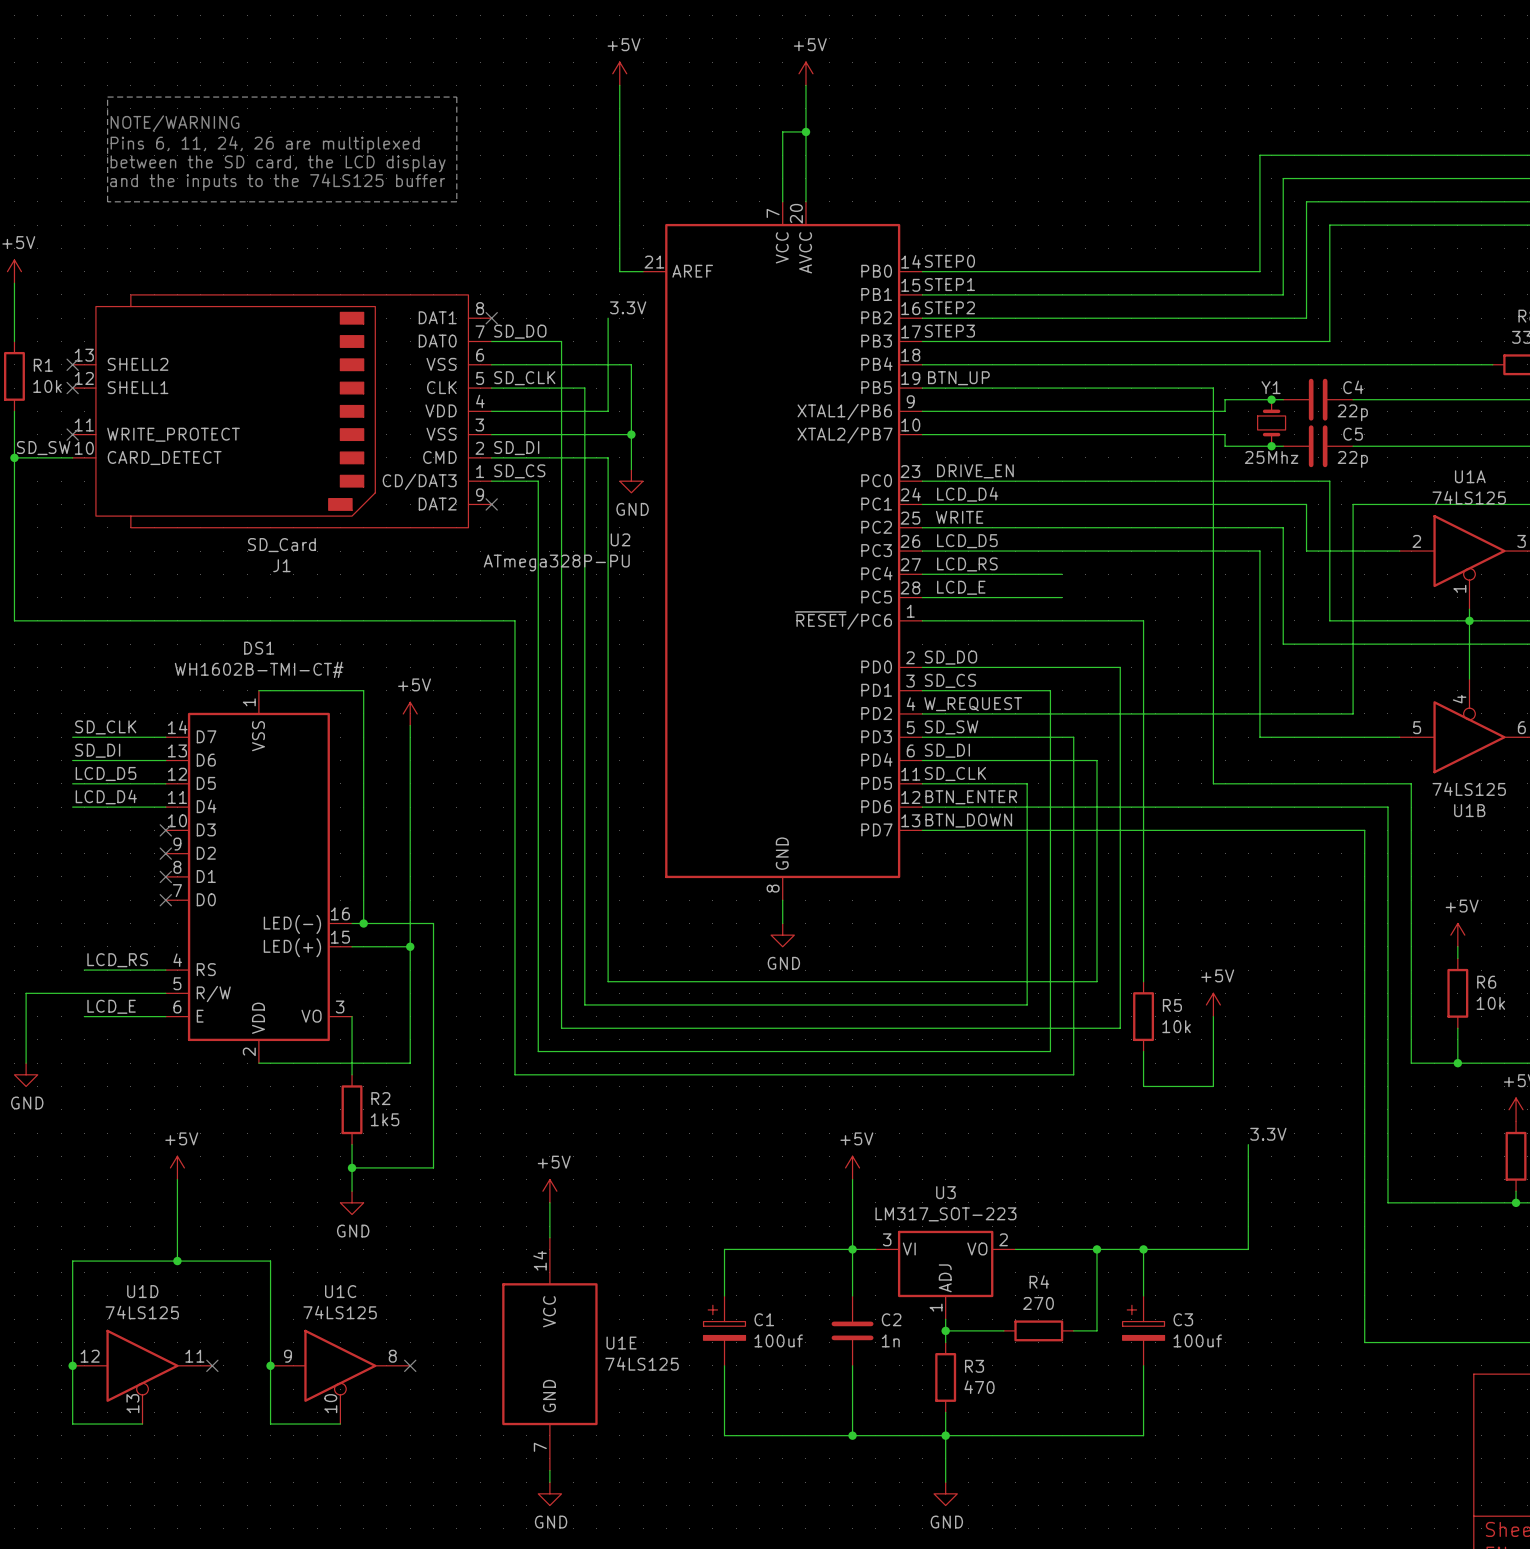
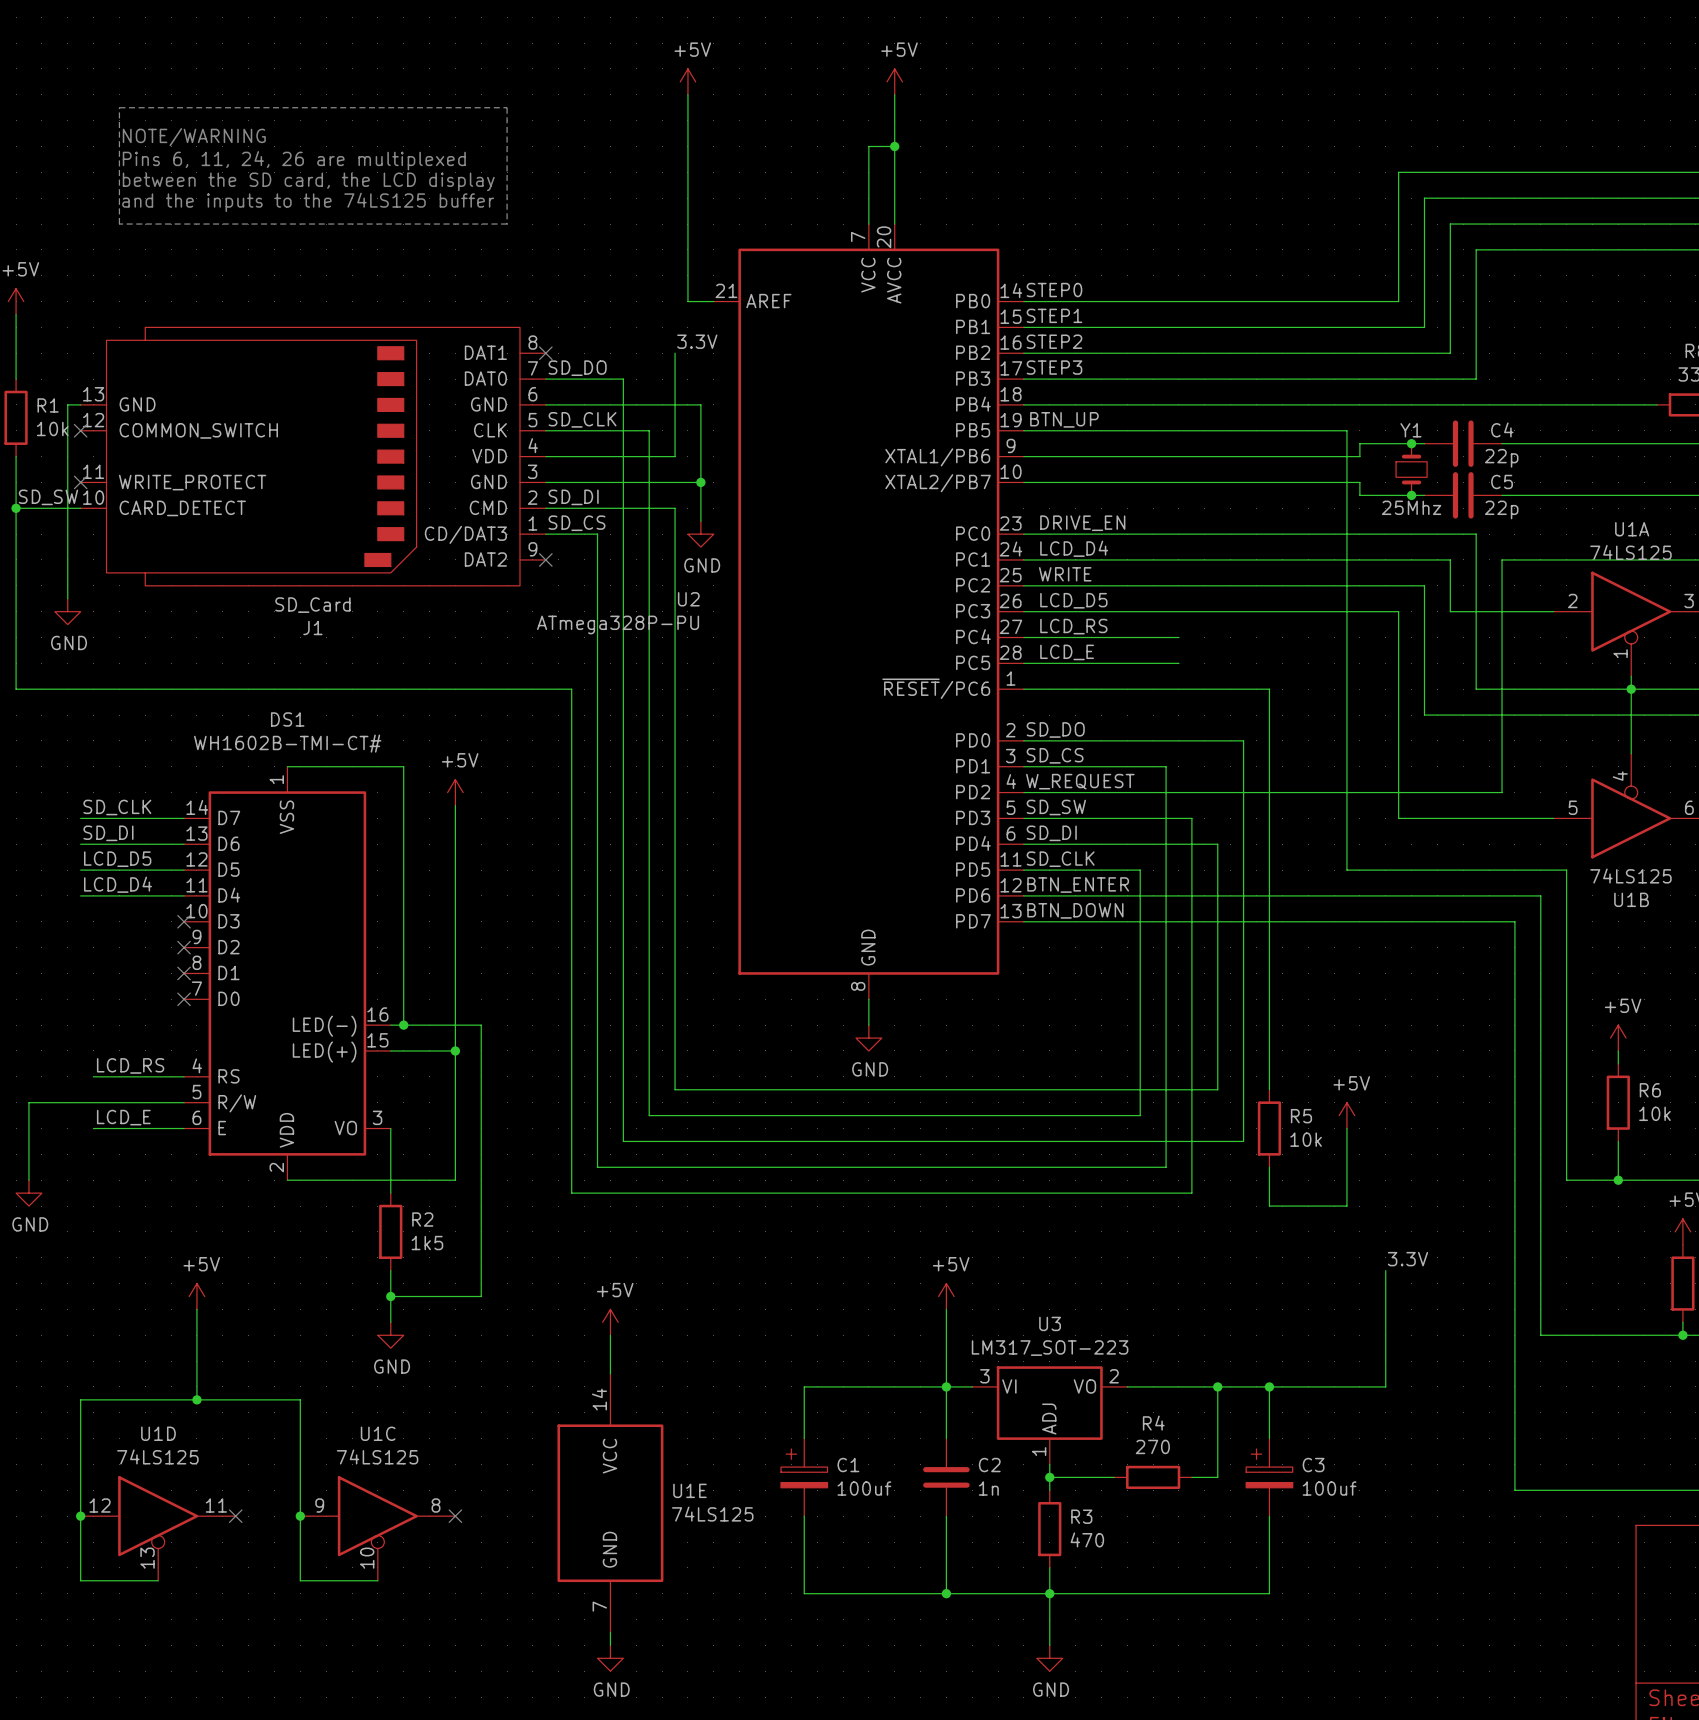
wire: none -> (80, 404) (67, 404) (67, 598)
no-connect mark: (72, 364) -> none
J1 pin name: SHELL2 (138, 364) -> GND (137, 404)
J1 pin name: VSS (441, 364) -> GND (488, 404)
J1 pin name: SHELL1 (138, 387) -> COMMON_SWITCH (198, 430)
J1 pin name: VSS (441, 434) -> GND (488, 481)
power symbol: none -> GND (67, 611)

